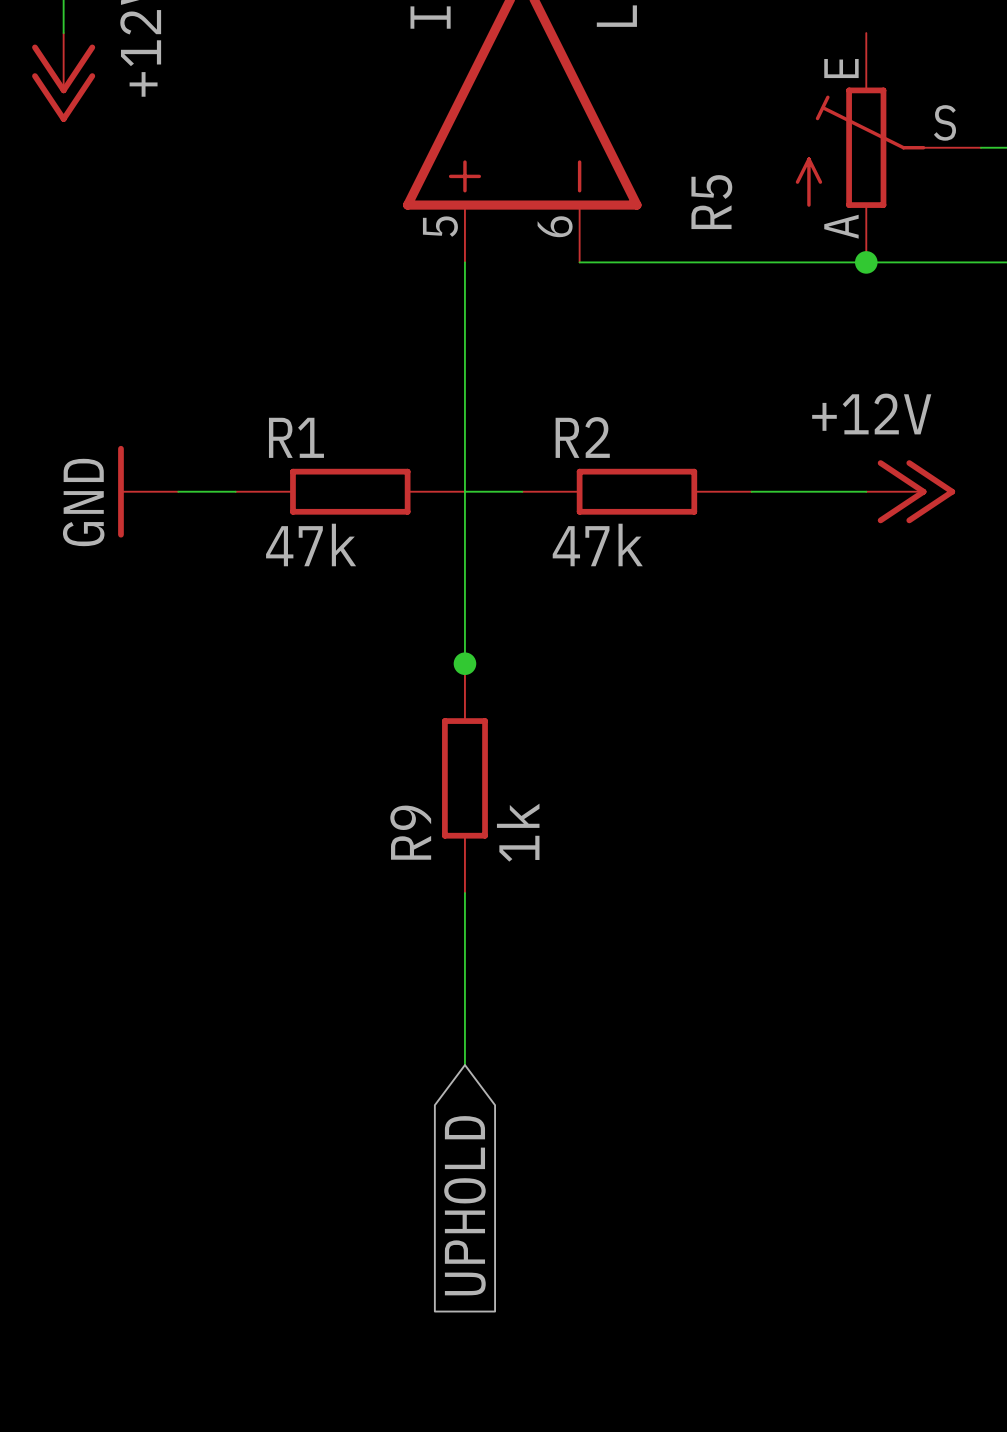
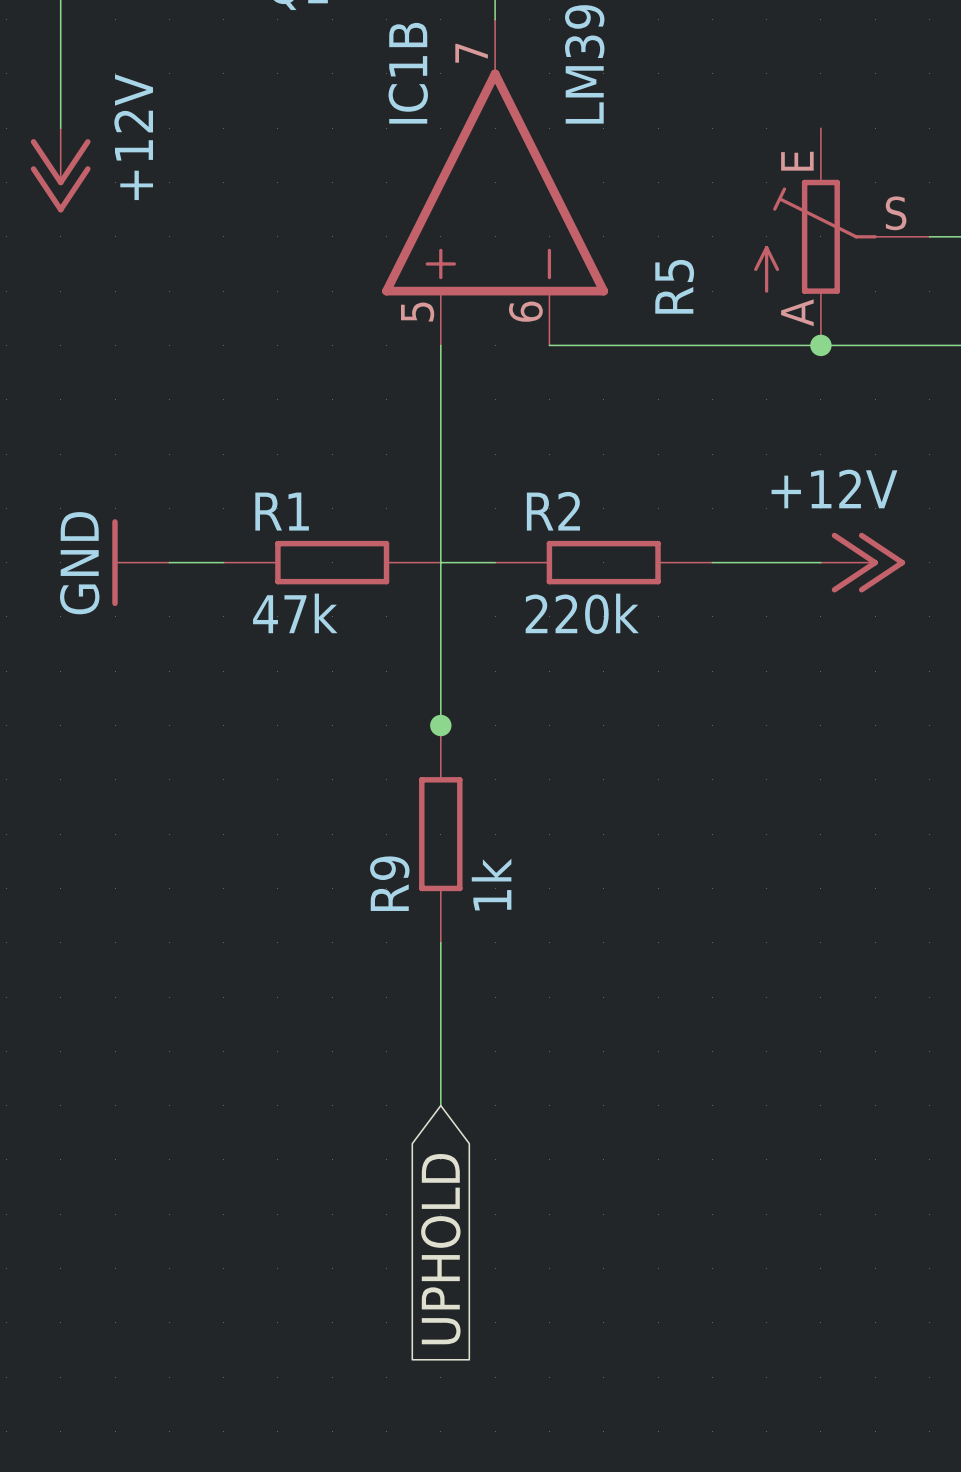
R2 value: 47k (597, 544) -> 220k (582, 613)

